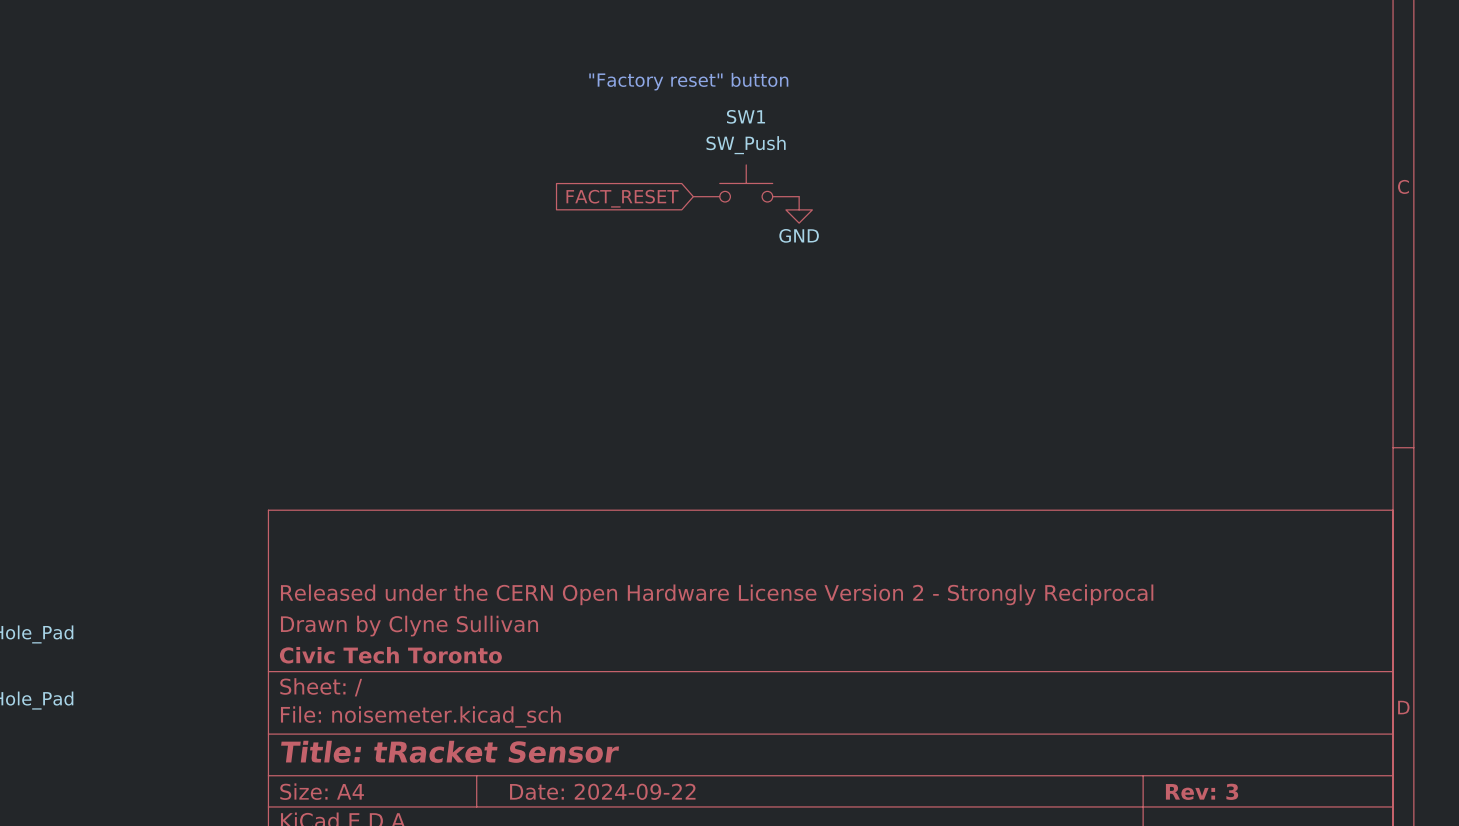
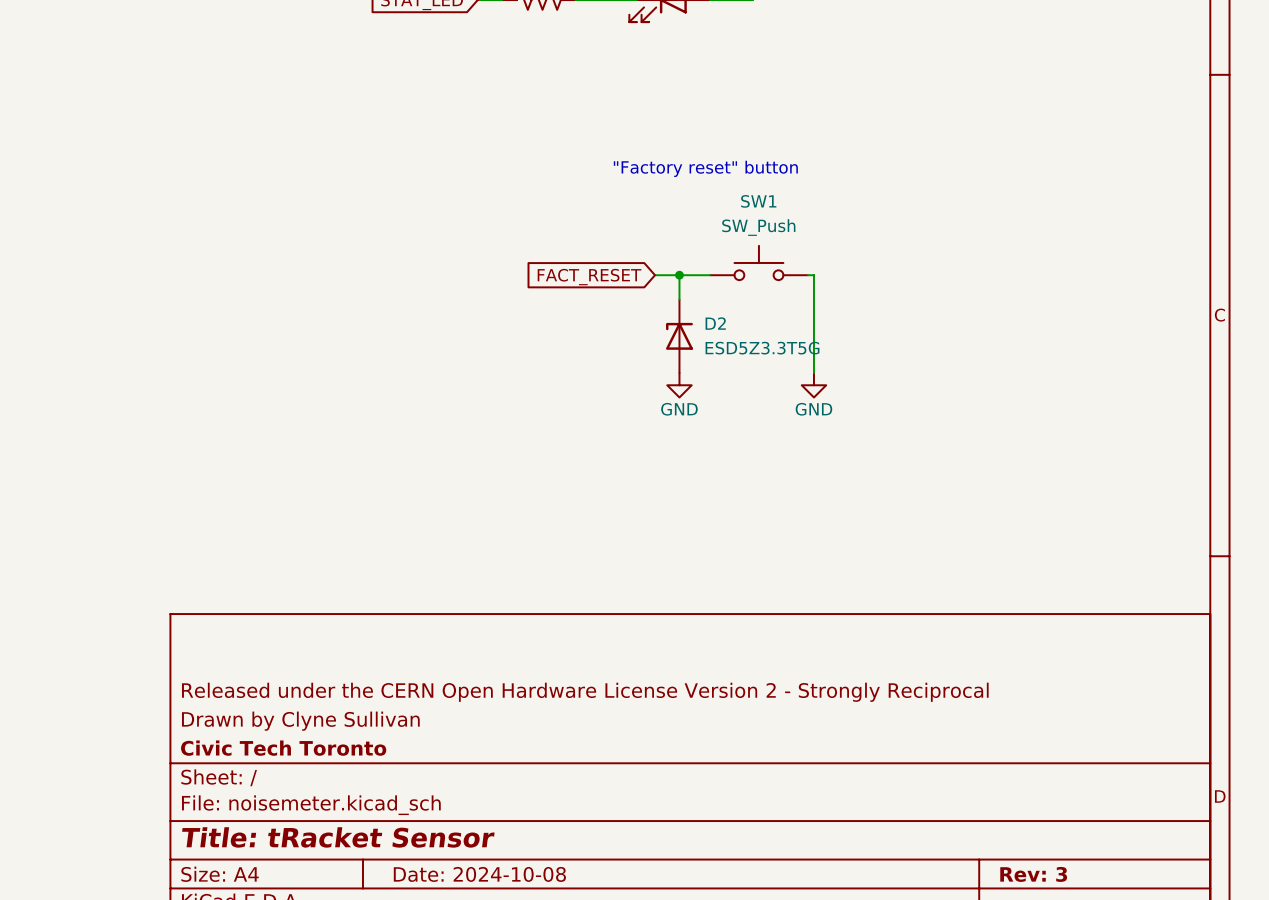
text position: "Factory reset" button (688, 81) -> "Factory reset" button (705, 168)
wire: none -> (655, 275) (710, 275)
wire: none -> (679, 275) (679, 299)
junction: none -> (679, 275)
wire: none -> (807, 275) (813, 275) (813, 373)
SW1 position: (746, 183) -> (758, 262)
global label position: FACT_RESET (622, 198) -> FACT_RESET (589, 277)
power symbol position: GND (799, 209) -> GND (679, 385)
D2: none -> ESD5Z3.3T5G (679, 336)
power symbol: none -> GND (813, 385)
title block: Date: 2024-09-22 (602, 791) -> Date: 2024-10-08 (479, 874)

